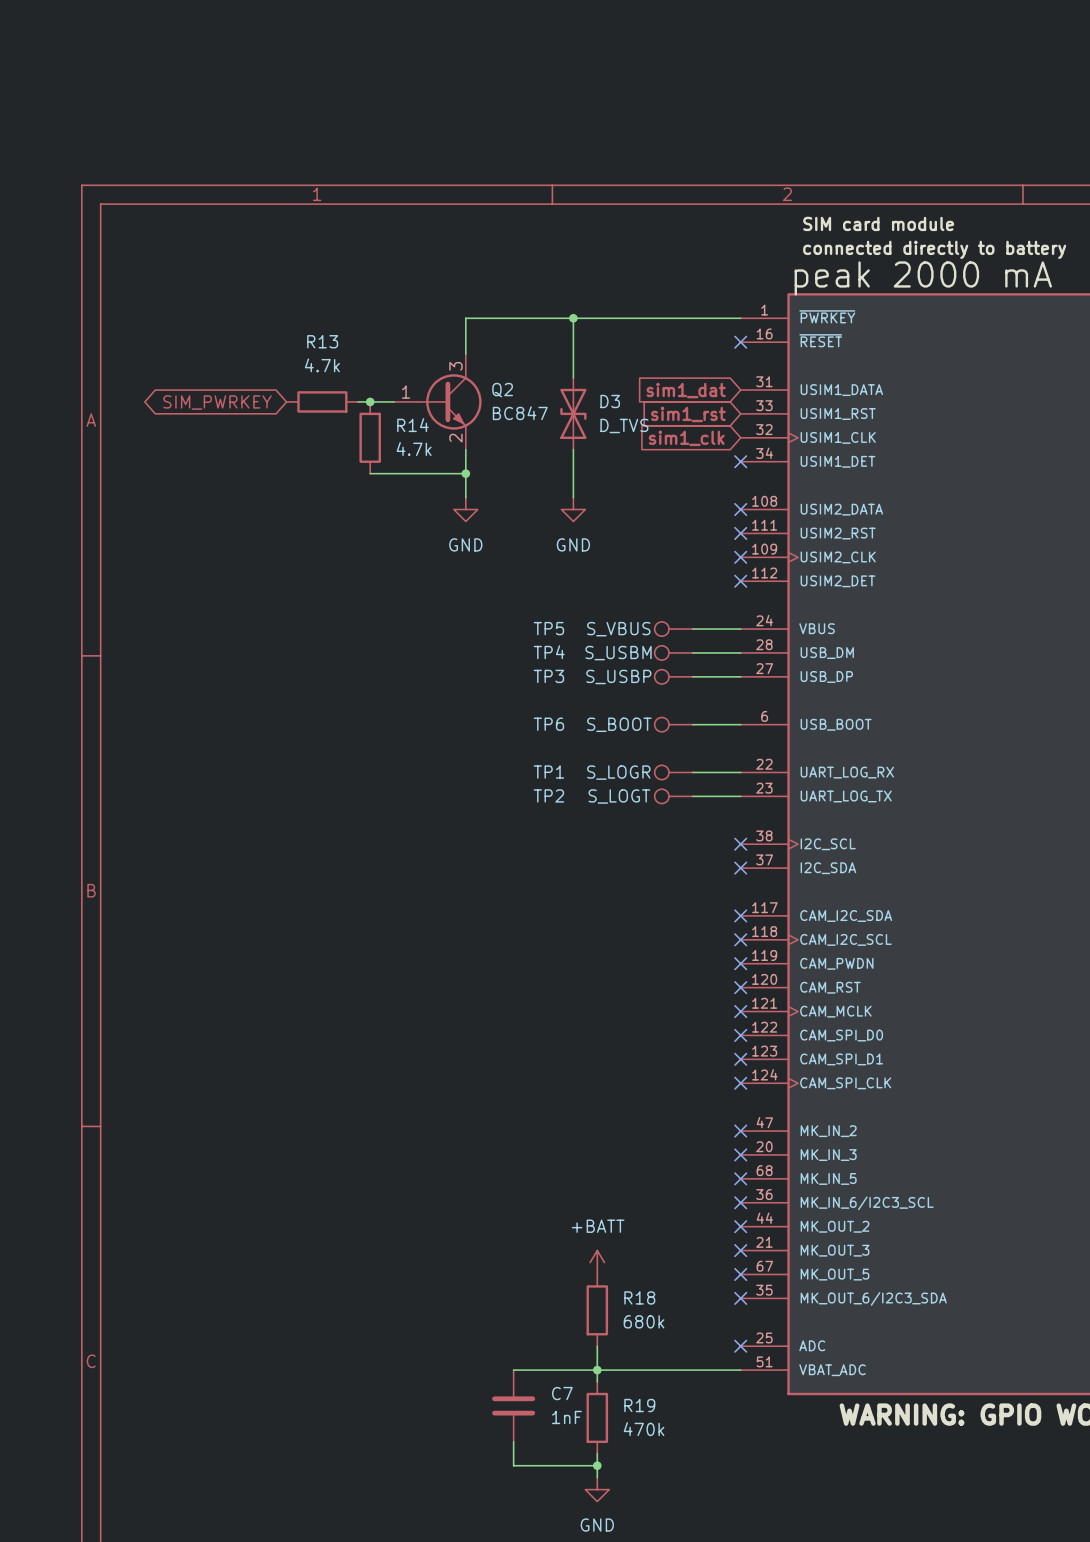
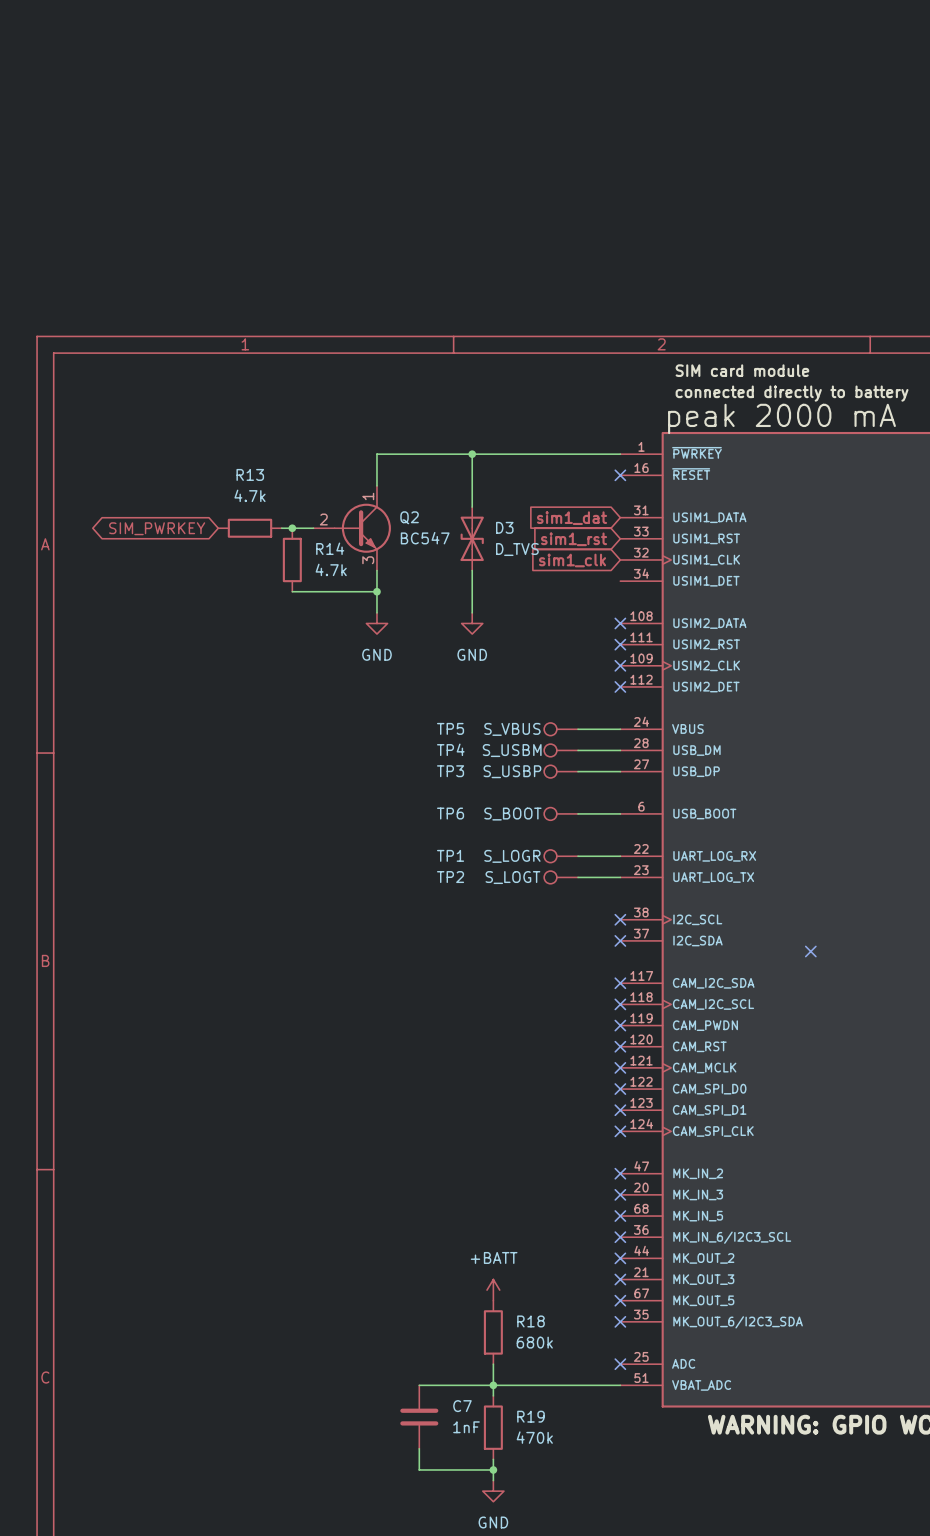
Q2 pin number: 3 (455, 366) -> 1 (368, 496)
Q2 pin number: 1 (406, 392) -> 2 (323, 519)
Q2 value: BC847 (520, 413) -> BC547 (425, 538)
Q2 pin number: 2 (455, 438) -> 3 (368, 560)
no-connect mark: (740, 461) -> none
no-connect mark: none -> (810, 951)

